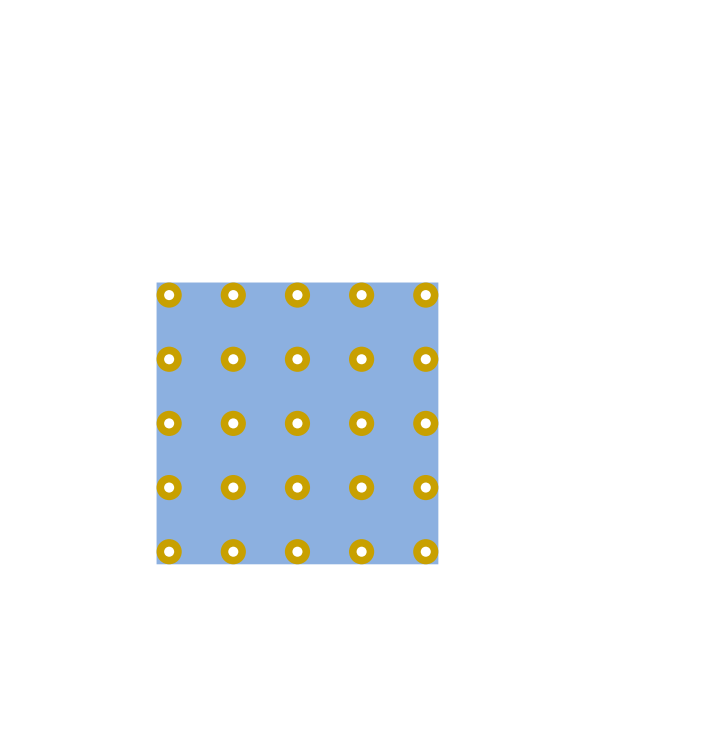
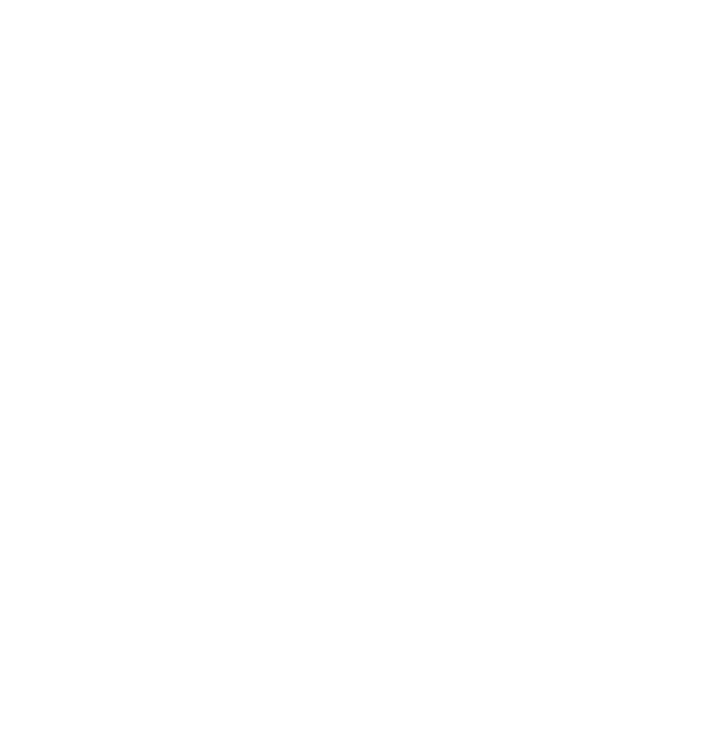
part: (297, 423) -> none

